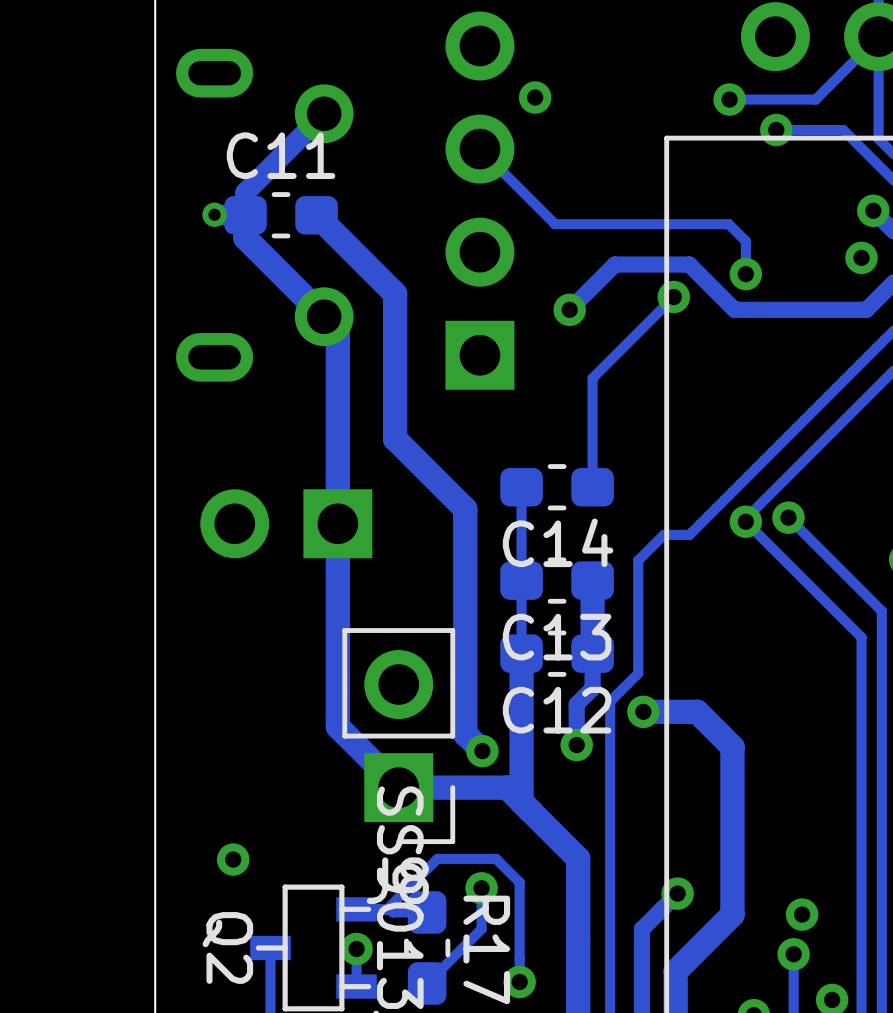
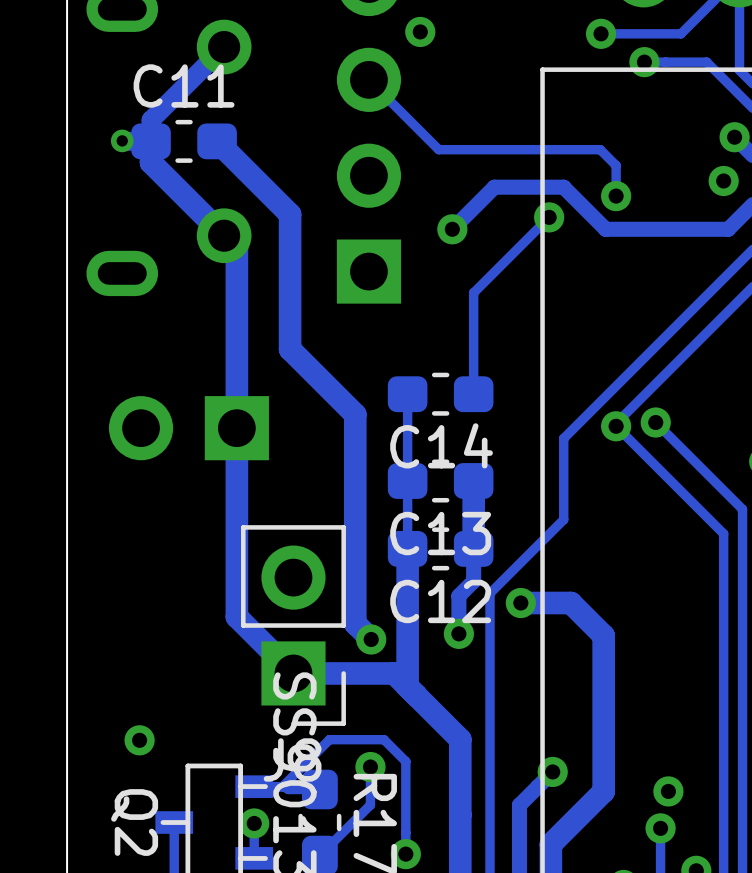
track: (689, 534) (663, 534) (638, 560) (638, 673) -> (563, 438) (563, 519) (516, 567)

